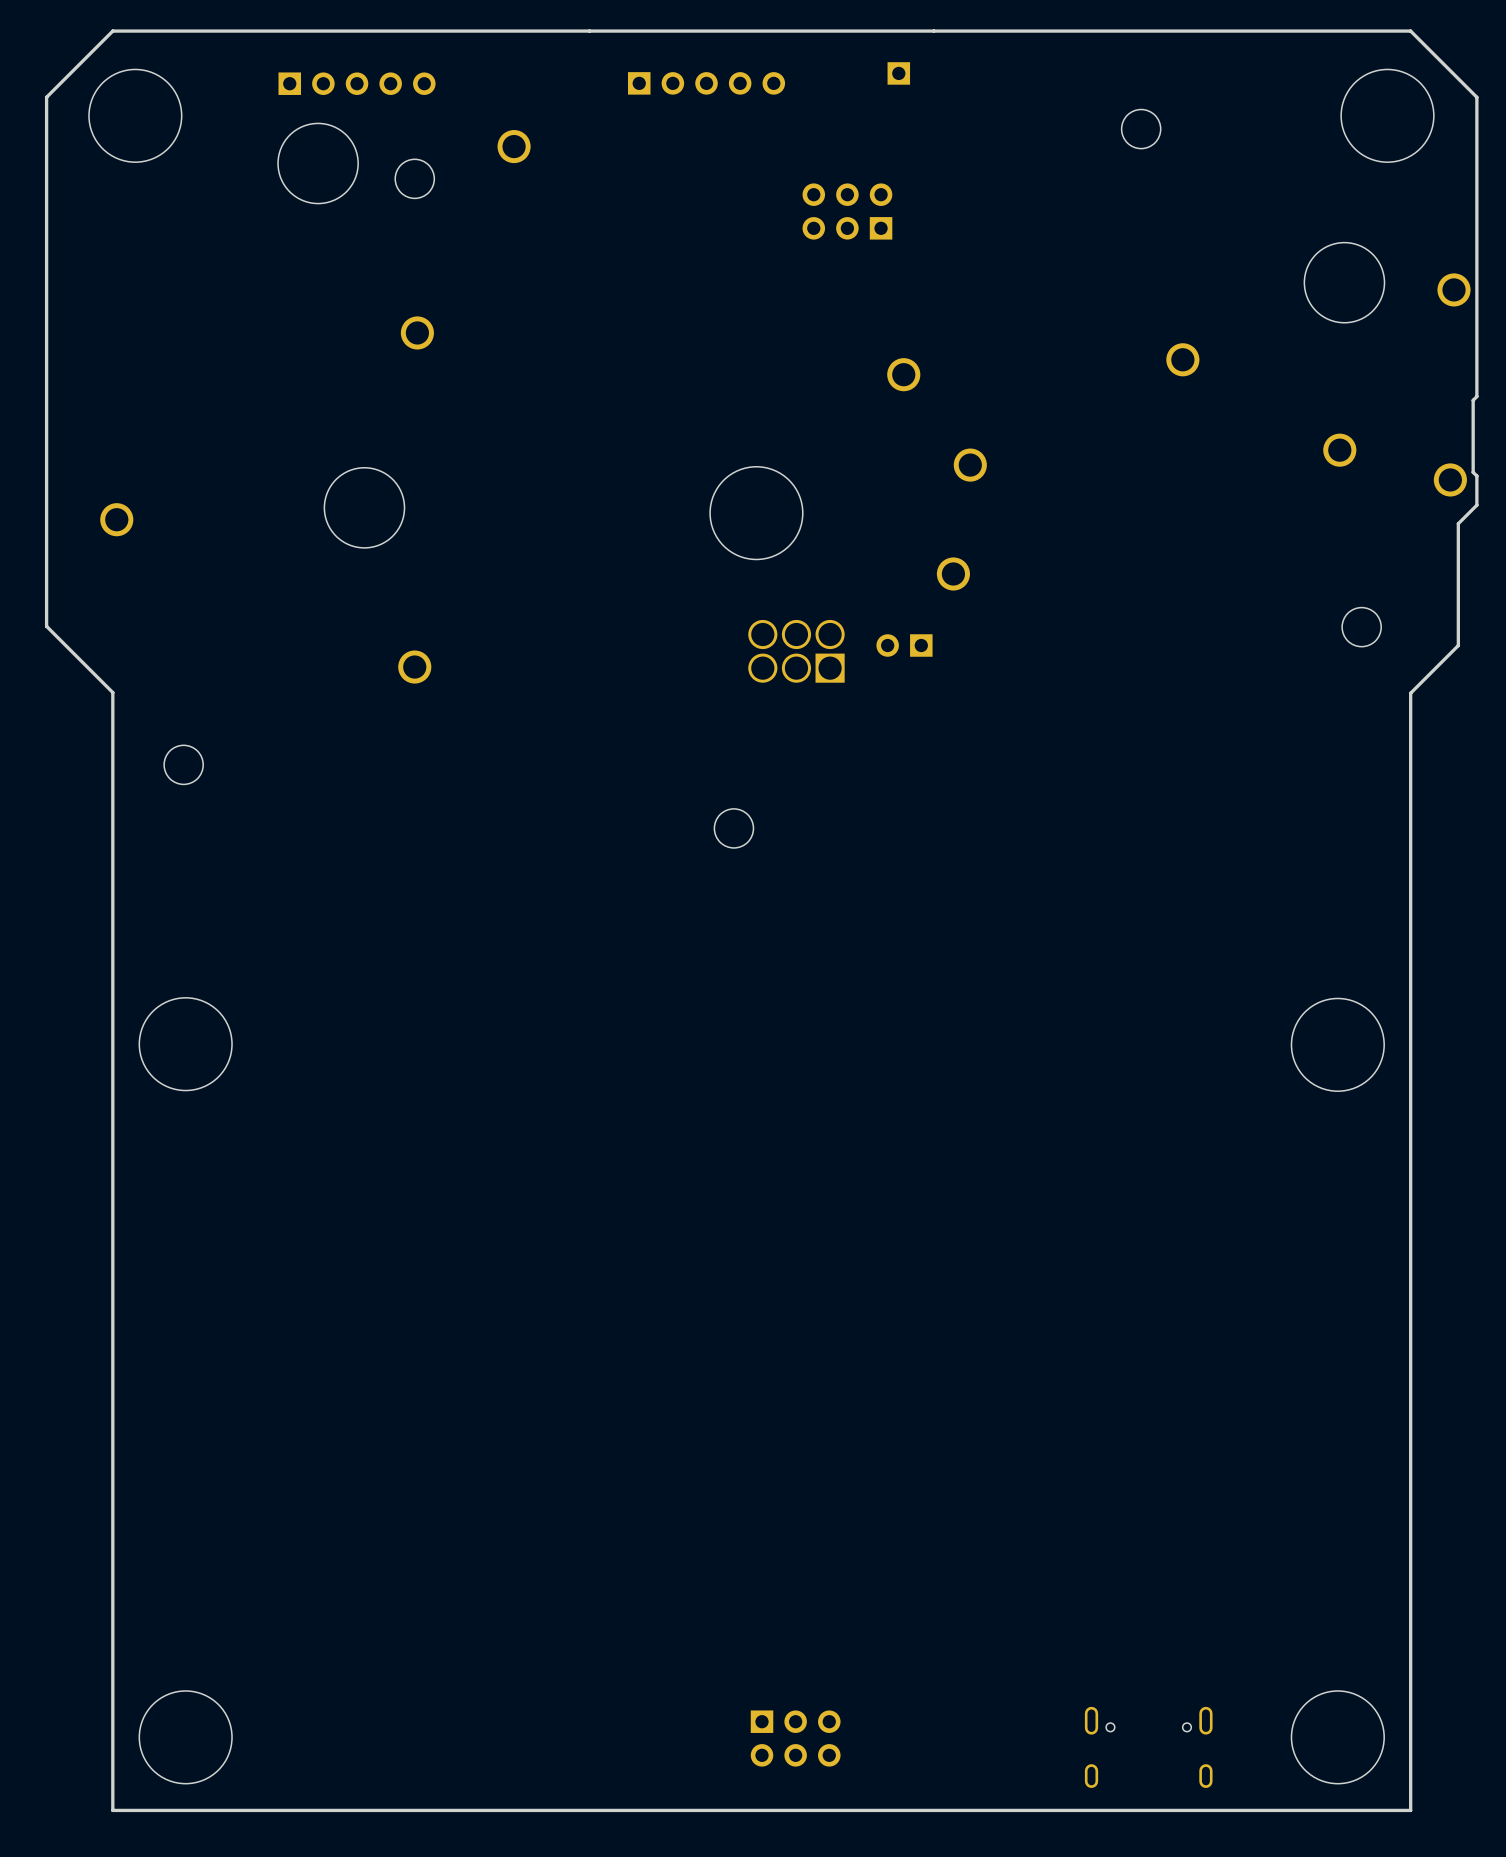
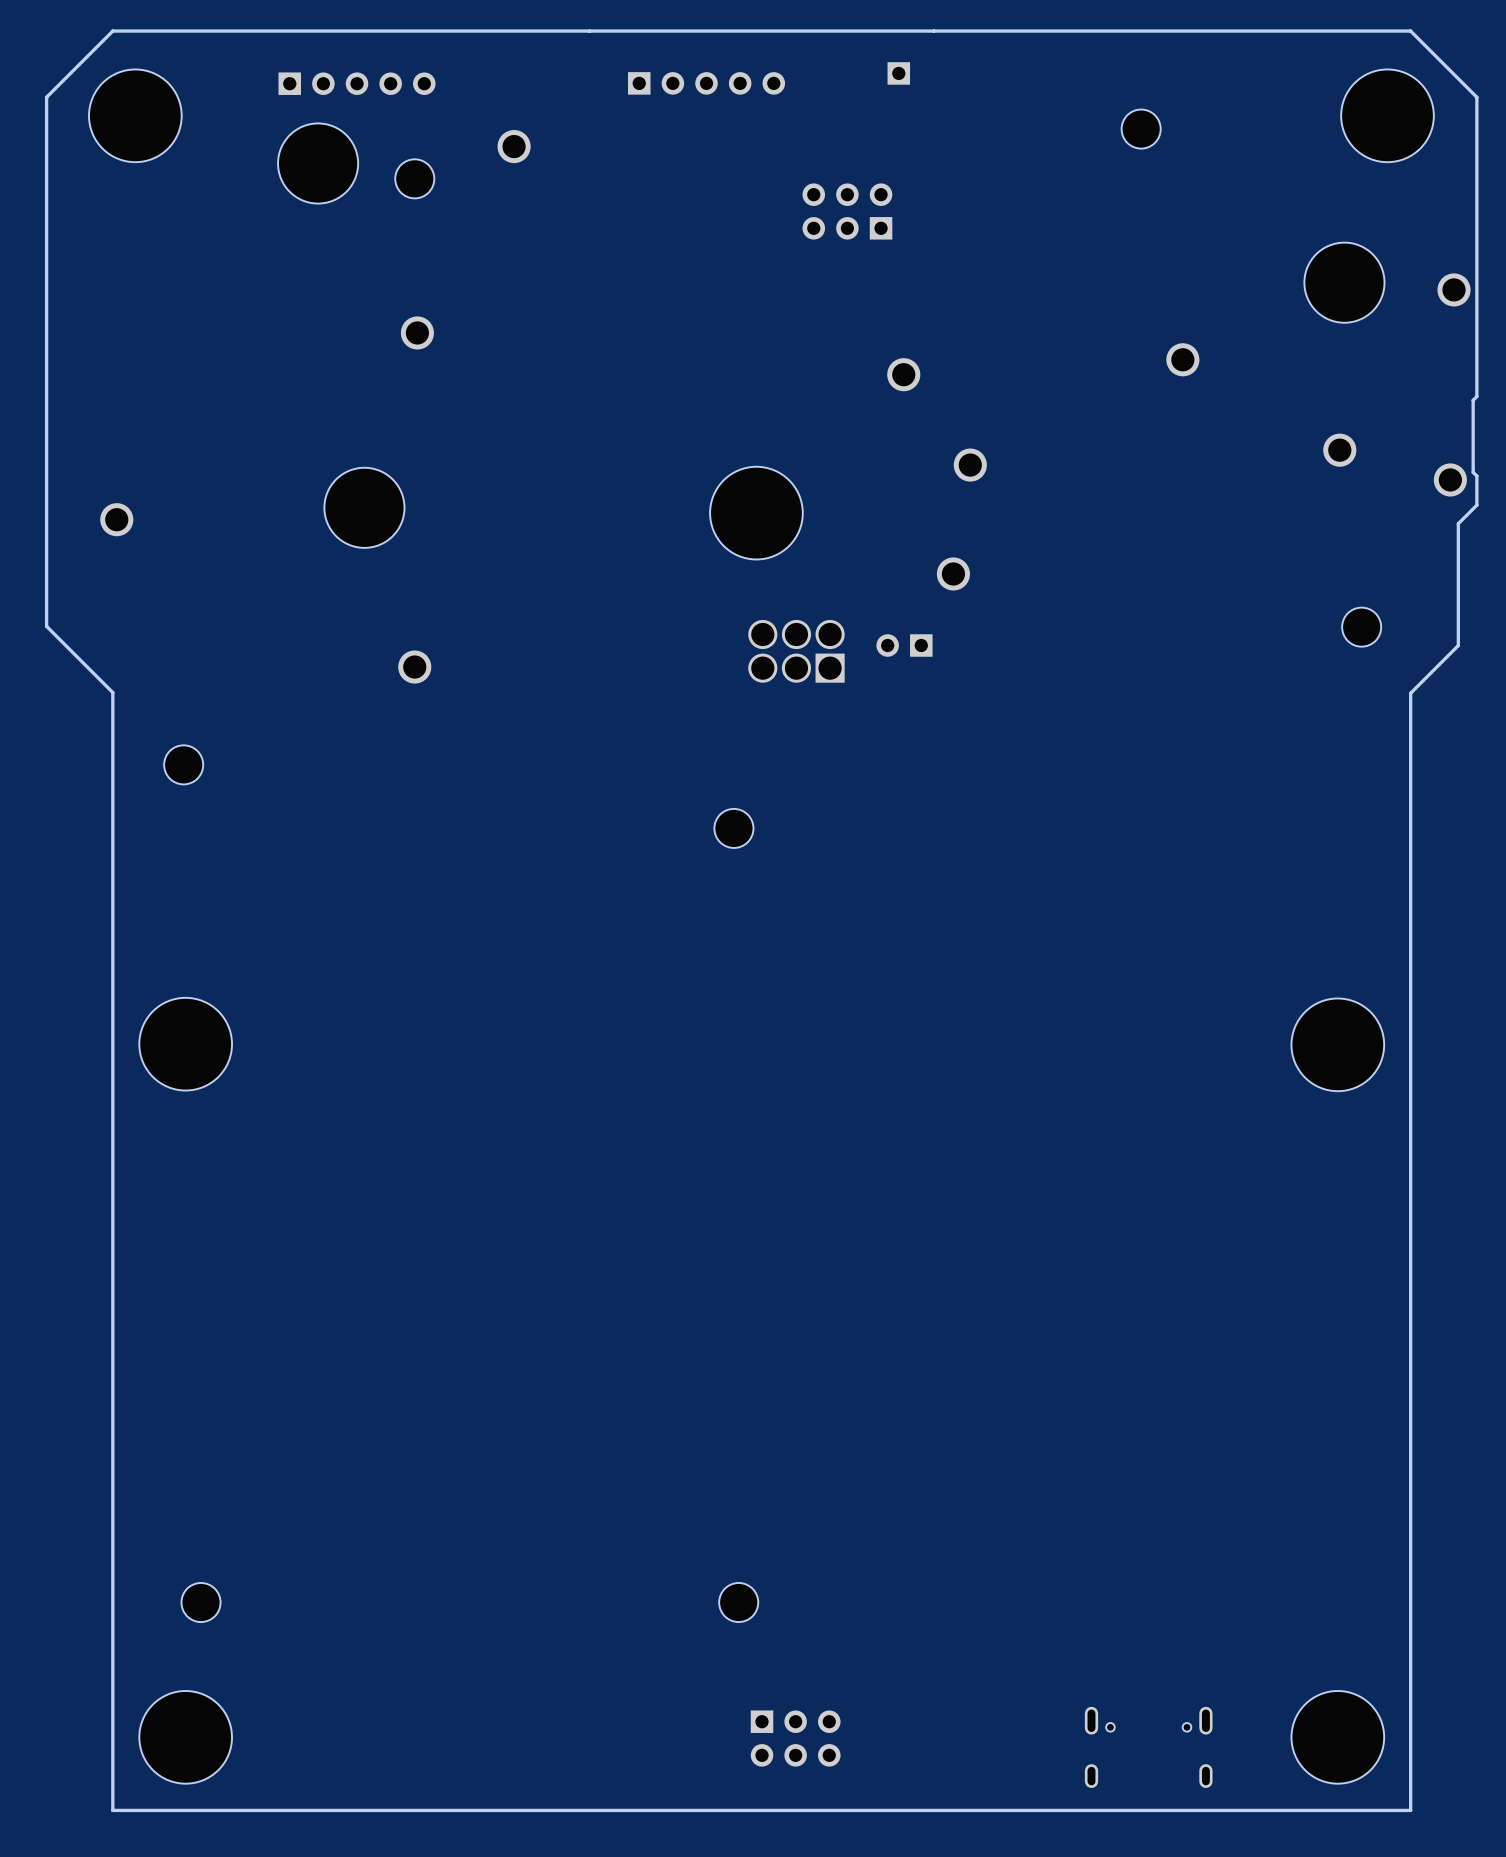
part: none -> (201, 1602)
part: none -> (738, 1602)

